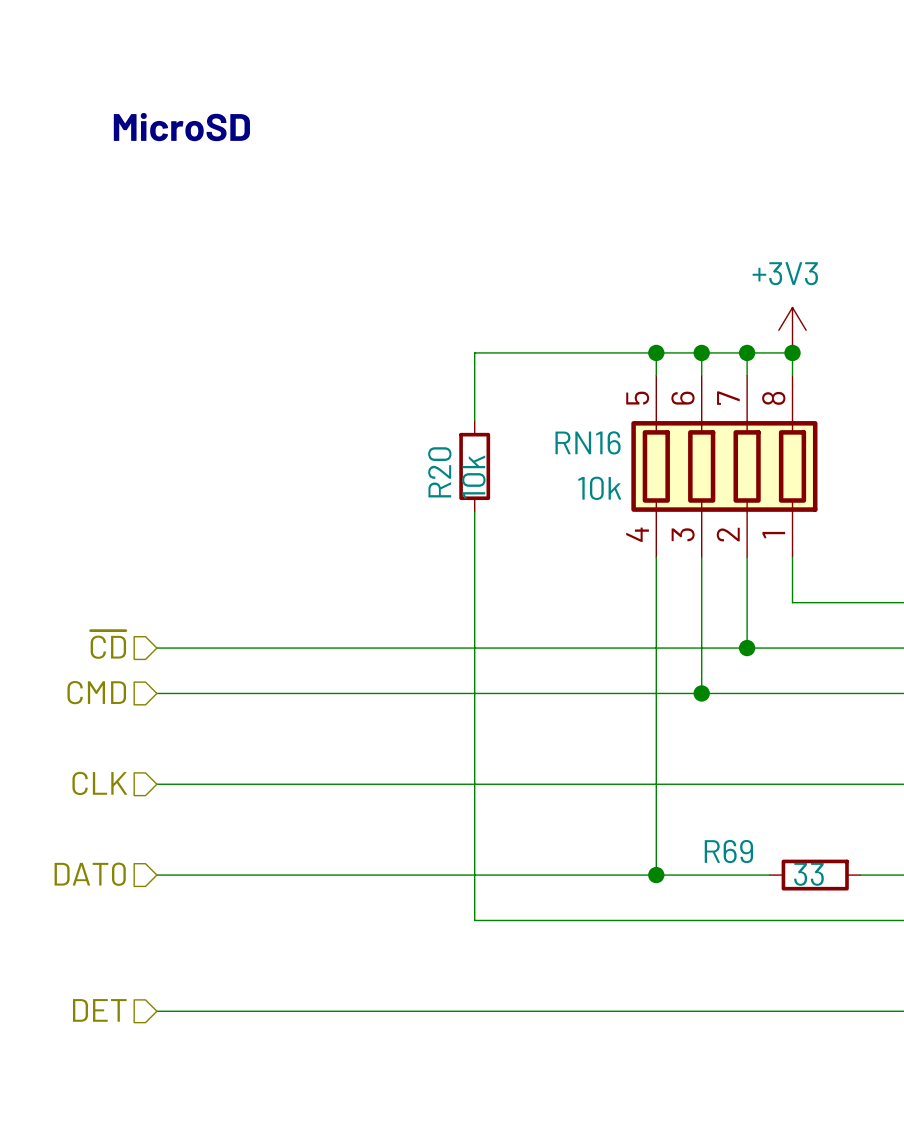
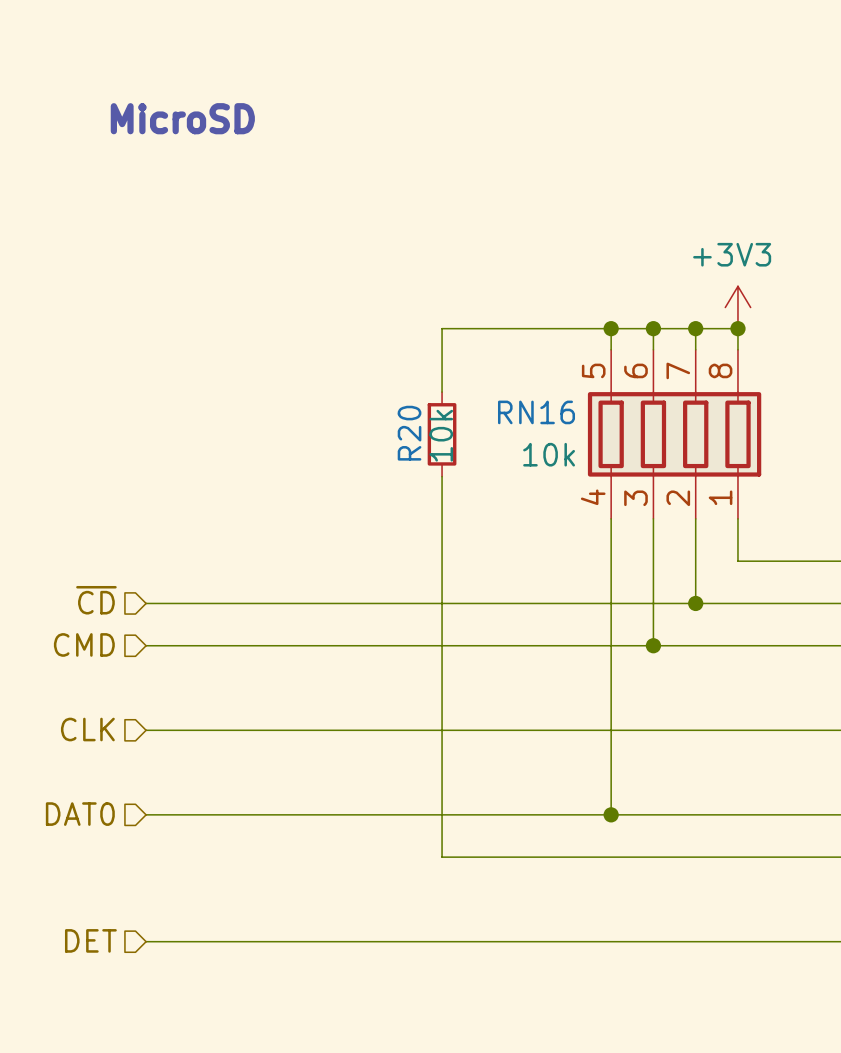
wire: none -> (716, 814) (801, 814)
R69: 33 (815, 875) -> none

